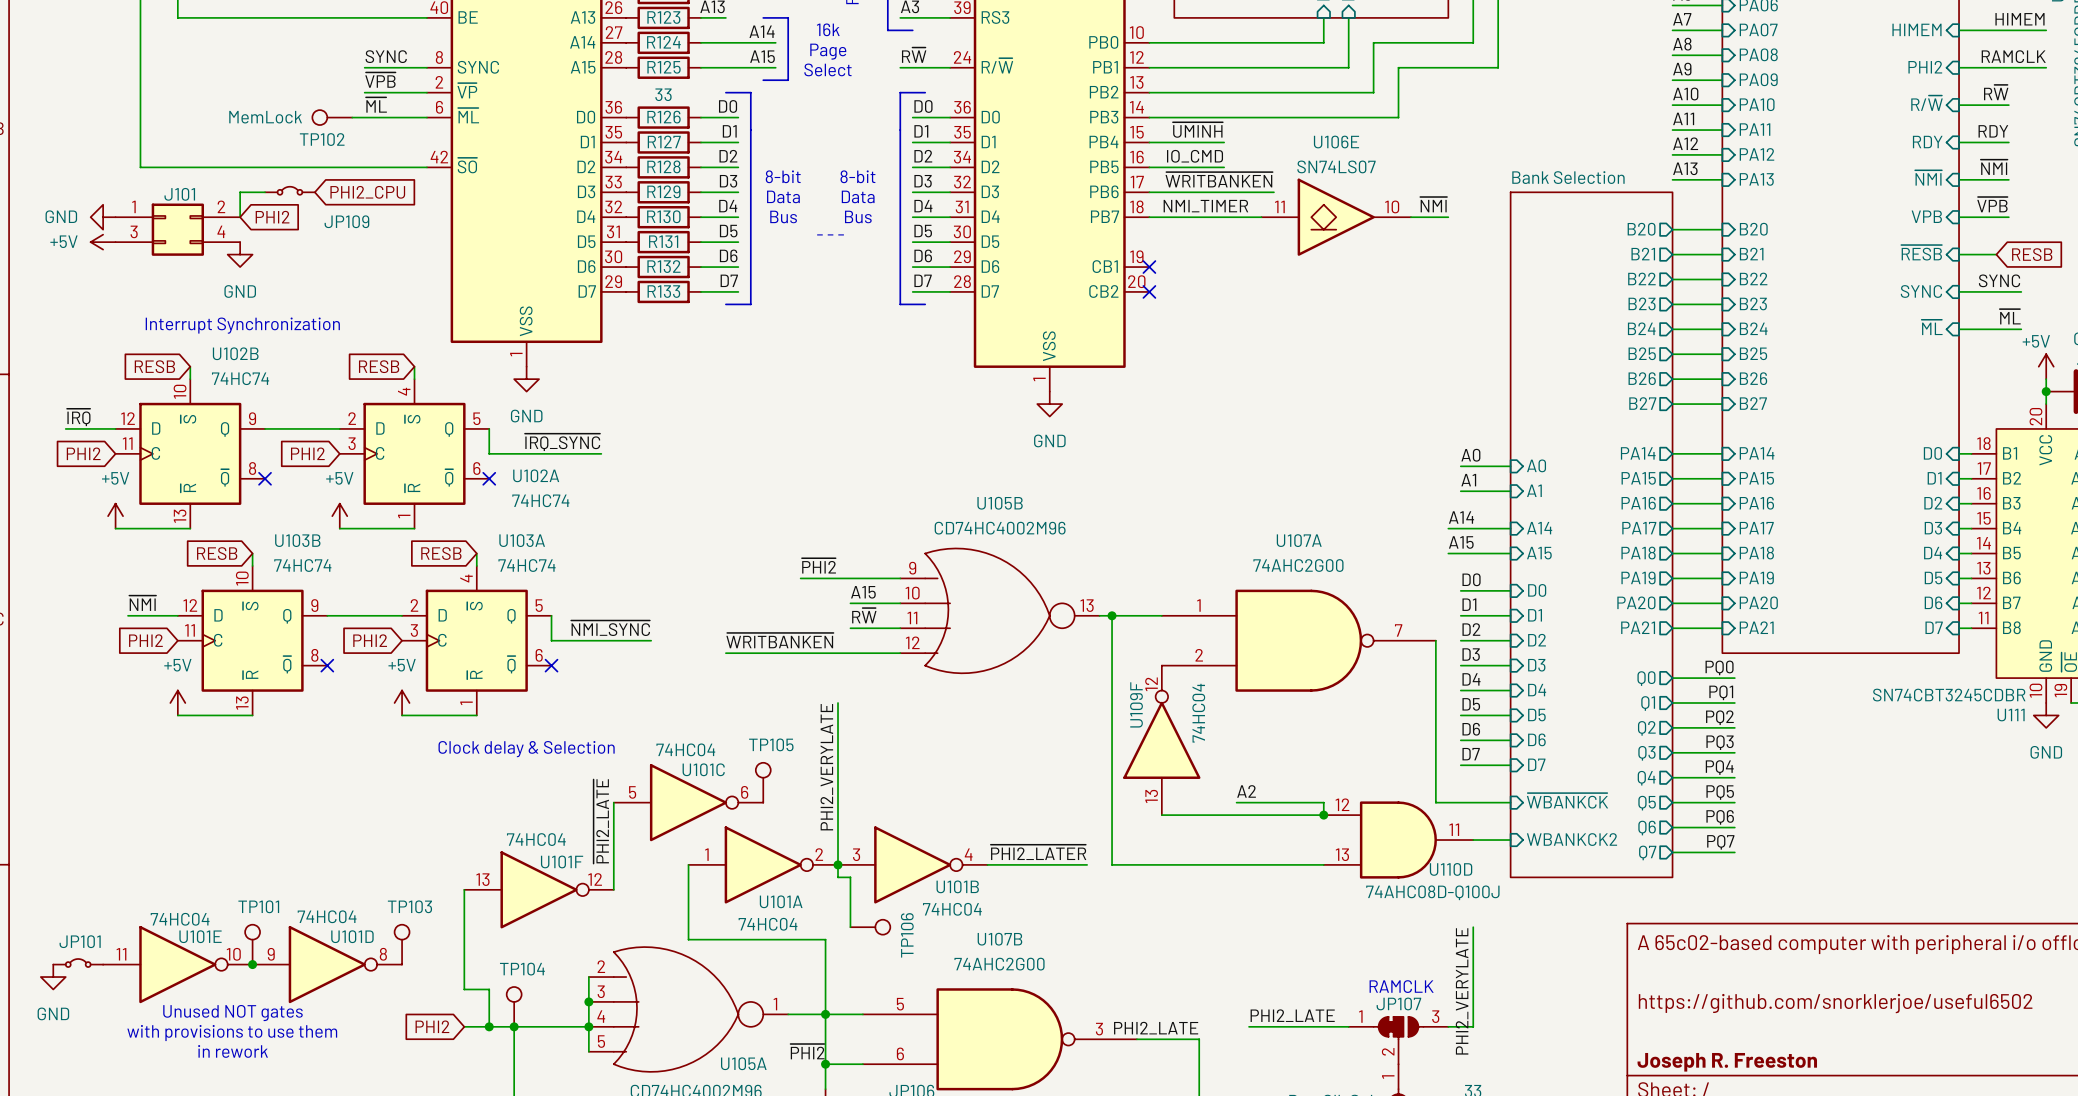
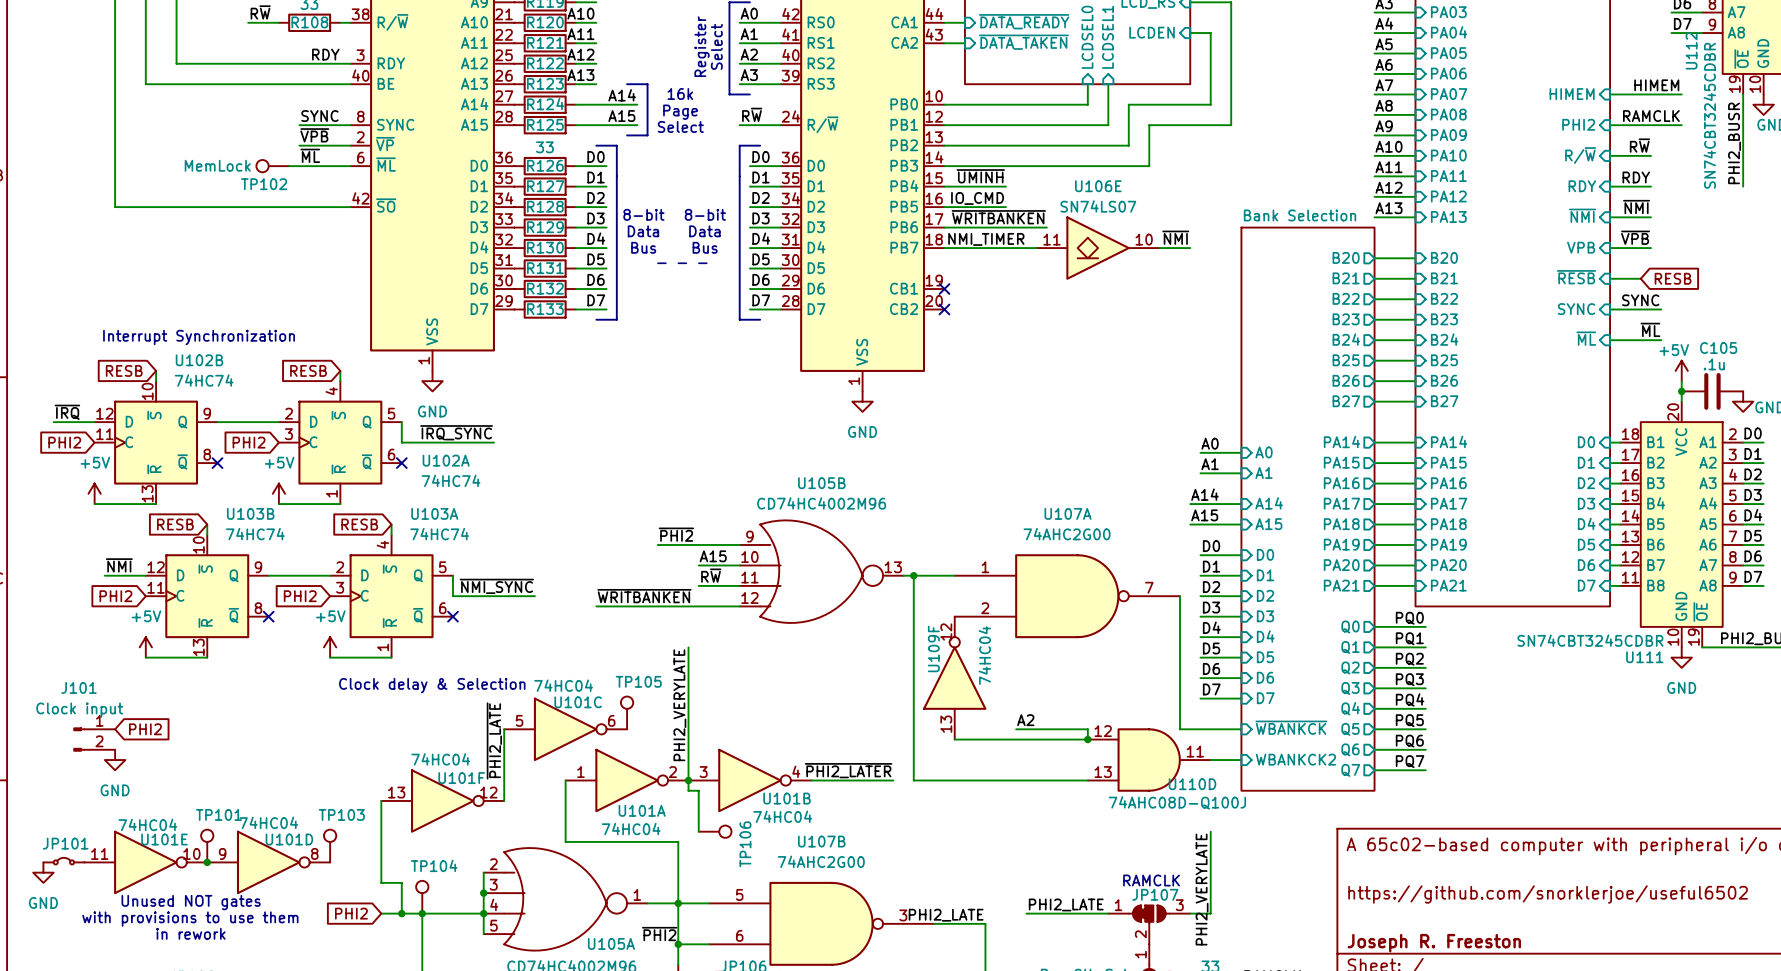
JP109: (289, 190) -> none
wire: (265, 192) (240, 192) (240, 217) -> none
global label: PHI2_CPU (367, 192) -> none
J101 name position: J101 (179, 194) -> J101 (79, 687)
J101 symbol: [115, 203, 241, 256] -> [73, 727, 116, 752]
power symbol: GND (103, 217) -> none
global label: PHI2 (272, 217) -> none
power symbol: +5V (103, 242) -> none
power symbol: GND (240, 254) -> none
J101 value: none -> Clock input (79, 710)
global label: none -> PHI2 (145, 729)
power symbol: none -> GND (115, 760)

